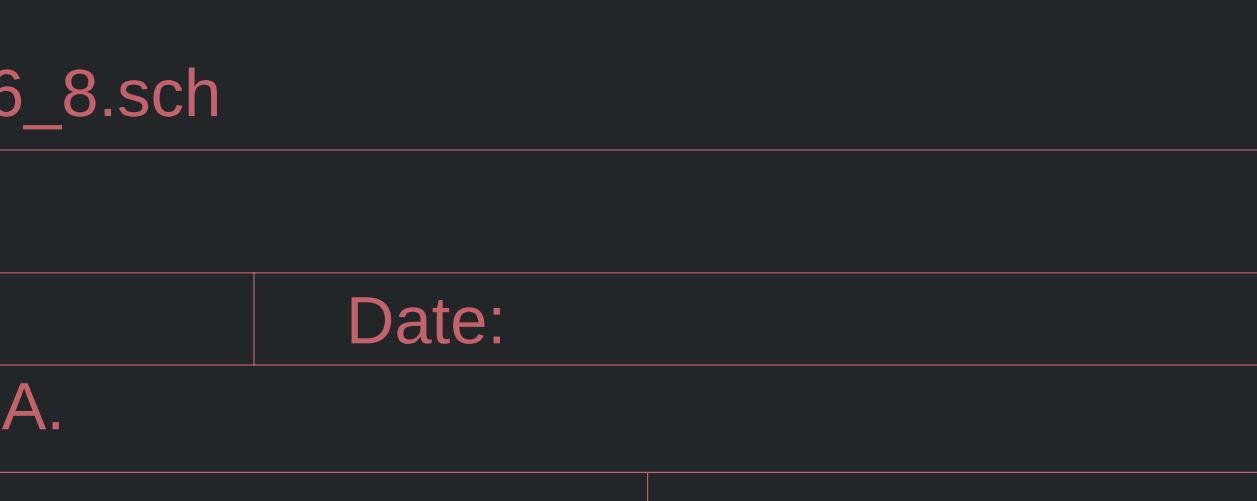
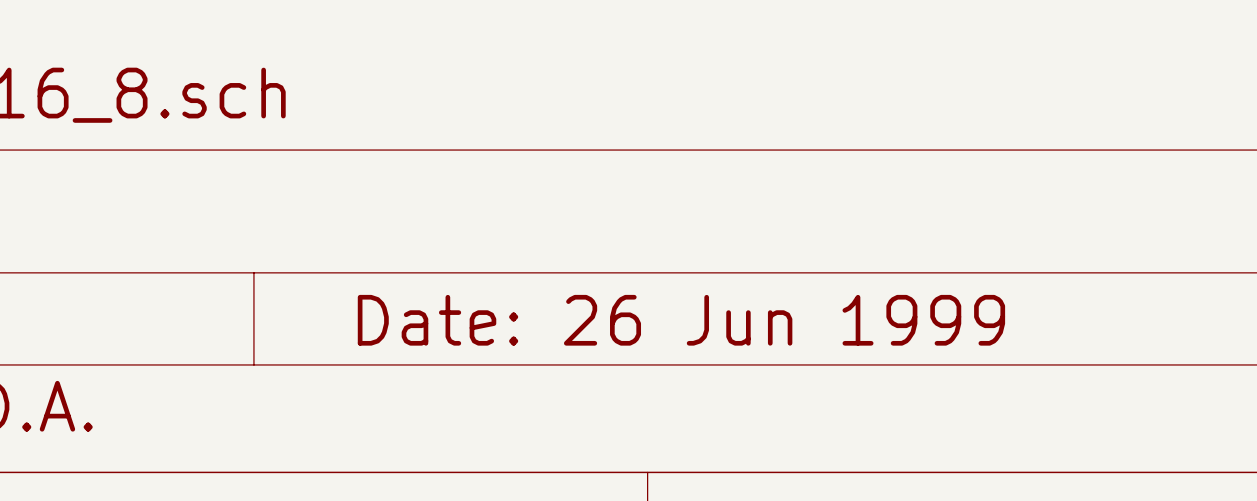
title block: Date: (425, 320) -> Date: 26 Jun 1999 (681, 320)

